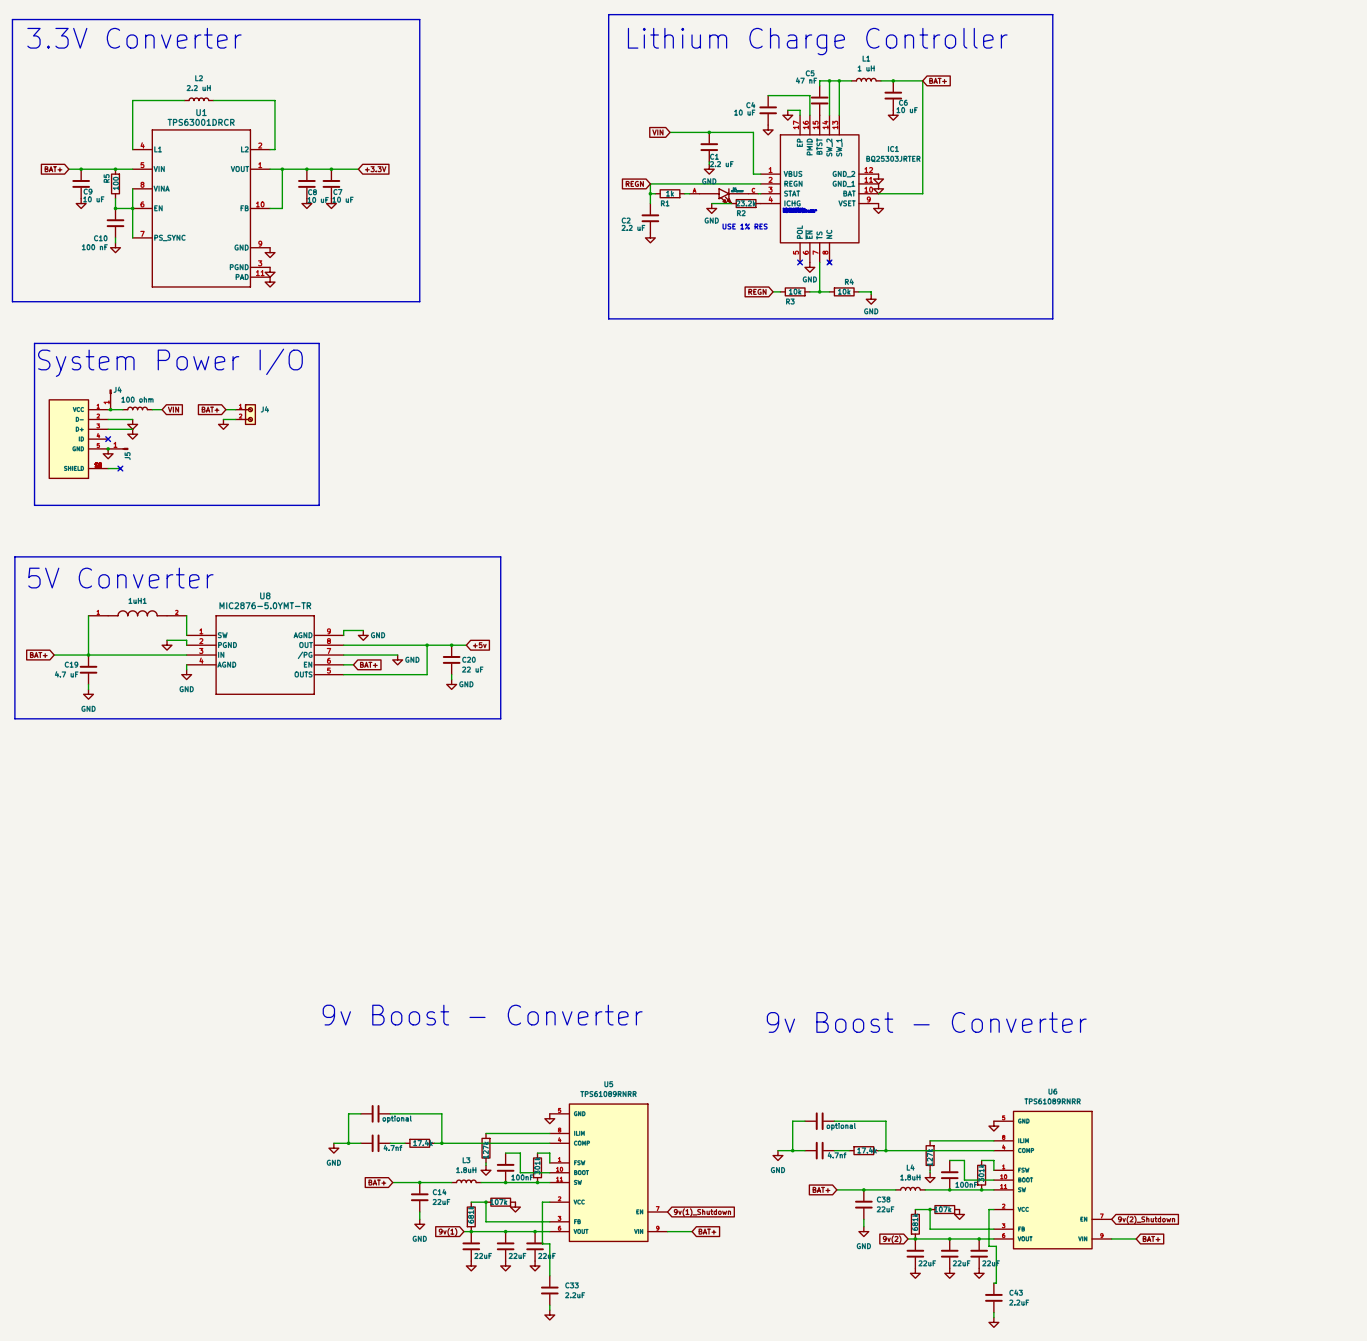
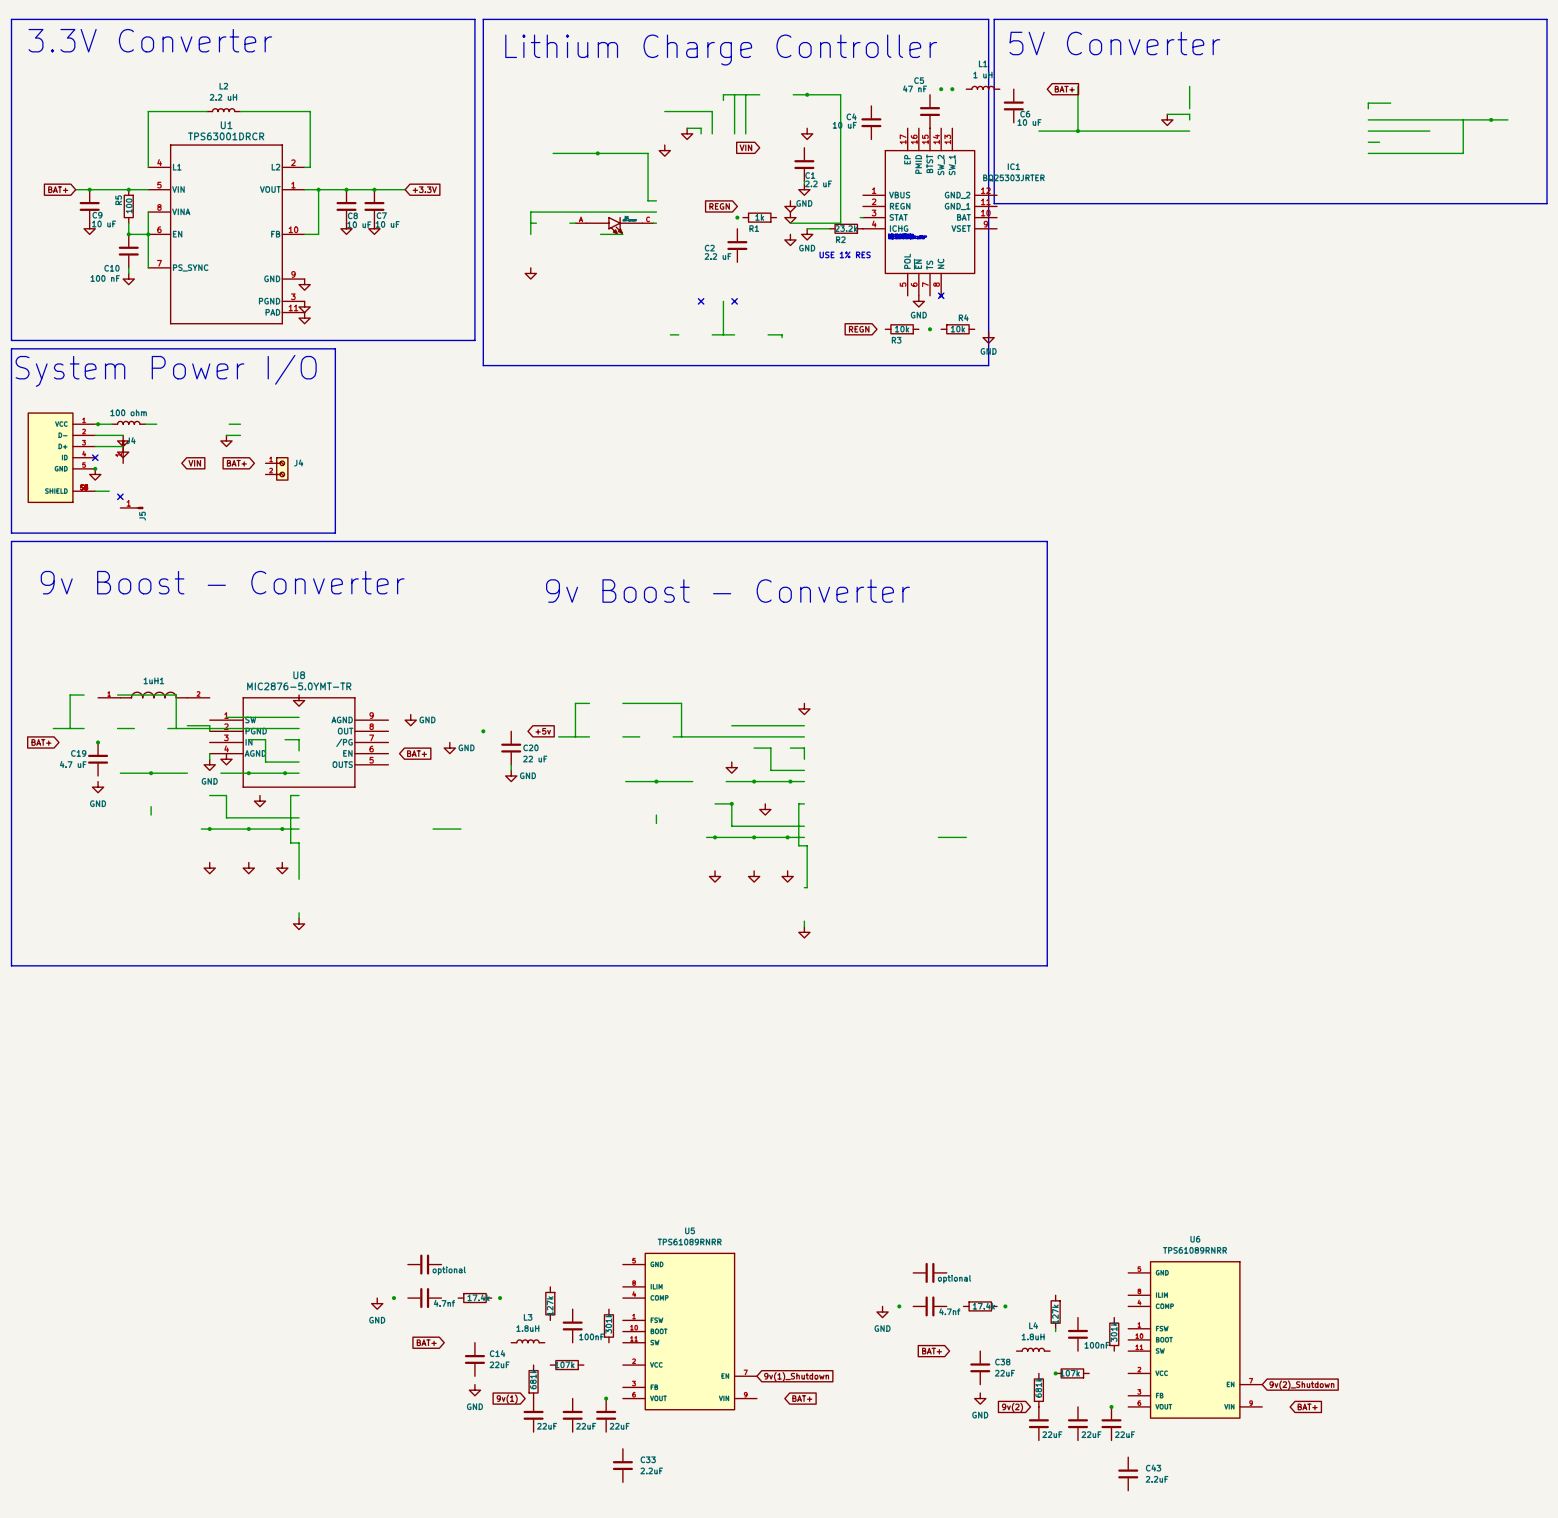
line: (608, 14) (1052, 14) (1052, 318) (608, 318) (608, 14) -> none
line: none -> (483, 19) (988, 19) (988, 365) (483, 365) (483, 19)
line: none -> (994, 19) (1547, 19) (1547, 203) (994, 203) (994, 19)
text: none -> 5V Converter (1114, 43)
text: Lithium Charge Controller (817, 41) -> none
text: none -> Lithium Charge Controller (721, 50)
wire: none -> (1077, 86) (1077, 131)
wire: none -> (1189, 86) (1189, 108)
wire: (829, 80) (829, 115) -> none
wire: (839, 80) (839, 115) -> none
wire: (851, 80) (819, 80) (819, 85) -> none
wire: (881, 80) (922, 80) (922, 193) (878, 193) -> none
junction: (893, 80) -> none
wire: none -> (734, 94) (734, 133)
wire: none -> (745, 94) (745, 133)
wire: none -> (759, 94) (723, 94) (723, 100)
wire: none -> (793, 94) (840, 94) (840, 223) (790, 223)
junction: none -> (807, 94)
wire: none -> (1390, 103) (1368, 103) (1368, 108)
wire: (768, 95) (809, 95) (809, 115) -> none
wire: none -> (664, 111) (712, 111) (712, 133)
wire: none -> (1167, 114) (1189, 114) (1189, 119)
power symbol: none -> (1167, 119)
wire: none -> (1368, 119) (1507, 119)
wire: none -> (1463, 119) (1463, 153) (1368, 153)
junction: none -> (1491, 119)
wire: (787, 110) (800, 110) (800, 115) -> none
wire: none -> (687, 128) (701, 128) (701, 133)
power symbol: (787, 115) -> none
power symbol: (893, 115) -> none
wire: none -> (1038, 131) (1189, 131)
junction: none -> (1077, 131)
wire: none -> (1368, 131) (1429, 131)
power symbol: none -> (687, 133)
power symbol: none -> (807, 133)
wire: none -> (1368, 142) (1379, 142)
power symbol: (768, 129) -> none
wire: (670, 132) (753, 132) (753, 174) (760, 174) -> none
junction: (709, 132) -> none
power symbol: none -> (664, 150)
wire: none -> (553, 153) (648, 153) (648, 200) (656, 200)
junction: none -> (597, 153)
power symbol: (878, 179) -> none
power symbol: none -> (790, 206)
wire: (760, 183) (650, 183) (650, 203) -> none
wire: none -> (656, 212) (530, 212) (530, 234)
power symbol: (878, 188) -> none
wire: (650, 193) (655, 193) -> none
wire: (684, 193) (689, 193) -> none
power symbol: none -> (790, 217)
part position: (723, 195) -> (614, 225)
wire: none -> (530, 223) (536, 223)
wire: none -> (569, 223) (575, 223)
wire: none -> (653, 223) (656, 223)
wire: none -> (600, 234) (622, 234)
power symbol: (878, 208) -> none
power symbol: none -> (790, 239)
power symbol: (650, 237) -> none
power symbol: none -> (530, 273)
no-connect mark: (800, 262) -> none
wire: (819, 262) (819, 291) -> none
no-connect mark: none -> (701, 301)
wire: none -> (723, 301) (723, 334)
no-connect mark: none -> (734, 301)
wire: (773, 291) (780, 291) -> none
wire: (809, 291) (829, 291) -> none
wire: (858, 291) (871, 291) (871, 294) -> none
wire: none -> (670, 334) (678, 334)
wire: none -> (712, 334) (734, 334)
wire: none -> (768, 334) (782, 334) (782, 337)
line: (34, 343) (319, 343) (319, 505) (34, 505) (34, 343) -> (11, 348) (335, 348) (335, 533) (11, 533) (11, 348)
text position: System Power I/O (170, 362) -> System Power I/O (166, 370)
junction: none -> (98, 424)
power symbol: none -> (123, 440)
power symbol: none -> (226, 440)
power symbol: none -> (123, 452)
no-connect mark: none -> (95, 457)
part position: (137, 408) -> (128, 422)
wire: (108, 409) (122, 409) -> (95, 424) (112, 424)
junction: (110, 409) -> none
wire: (152, 409) (162, 409) -> (145, 424) (156, 424)
wire: (225, 409) (235, 409) -> (229, 424) (240, 424)
junction: none -> (95, 468)
power symbol: none -> (95, 474)
wire: (108, 419) (132, 419) -> (95, 435) (123, 435)
wire: (223, 419) (235, 419) -> (226, 435) (240, 435)
power symbol: (132, 424) -> none
power symbol: (223, 424) -> none
wire: (108, 429) (132, 429) -> (95, 446) (123, 446)
power symbol: (132, 434) -> none
part position: (78, 439) -> (61, 457)
junction: (108, 448) -> none
power symbol: (108, 453) -> none
wire: (108, 468) (120, 468) -> (95, 491) (109, 491)
no-connect mark: (120, 468) -> none
line: none -> (11, 541) (11, 965) (1047, 965) (1047, 541) (11, 541)
text: none -> 9v Boost - Converter (222, 582)
text: none -> 9v Boost - Converter (727, 591)
line: (14, 556) (500, 556) (500, 718) (14, 718) (14, 556) -> none
text: 5V Converter (120, 578) -> none
wire: none -> (84, 695) (70, 695) (70, 728)
wire: none -> (117, 695) (176, 695) (176, 728)
wire: (88, 615) (88, 655) -> none
wire: (186, 615) (186, 635) -> none
power symbol: none -> (299, 700)
wire: none -> (589, 703) (575, 703) (575, 736)
wire: none -> (622, 703) (681, 703) (681, 736)
power symbol: none -> (804, 708)
wire: (363, 630) (343, 630) (343, 635) -> none
wire: none -> (226, 717) (299, 717)
wire: none -> (731, 725) (804, 725)
wire: none -> (53, 728) (84, 728)
wire: none -> (117, 728) (134, 728)
wire: none -> (167, 728) (299, 728)
power symbol position: (167, 645) -> (226, 759)
wire: (343, 645) (466, 645) -> none
wire: (427, 645) (427, 674) (343, 674) -> none
junction: (451, 645) -> none
wire: none -> (558, 736) (589, 736)
wire: none -> (622, 736) (639, 736)
wire: none -> (673, 736) (804, 736)
wire: none -> (248, 739) (265, 739) (265, 762) (299, 762)
wire: none -> (285, 739) (299, 739) (299, 750)
wire: (54, 655) (186, 655) -> none
wire: (343, 655) (397, 655) -> none
wire: none -> (754, 748) (770, 748) (770, 770) (804, 770)
wire: none -> (790, 748) (804, 748) (804, 759)
wire: (343, 664) (353, 664) -> none
power symbol: none -> (731, 767)
wire: none -> (120, 773) (187, 773)
junction: none -> (151, 773)
wire: none -> (220, 773) (299, 773)
junction: none -> (248, 773)
junction: none -> (285, 773)
wire: (88, 684) (88, 689) -> none
wire: none -> (625, 781) (692, 781)
junction: none -> (656, 781)
wire: none -> (726, 781) (804, 781)
junction: none -> (754, 781)
junction: none -> (790, 781)
wire: none -> (209, 795) (226, 795) (226, 817) (299, 817)
wire: none -> (299, 795) (290, 795) (290, 842) (299, 842) (299, 879)
power symbol: none -> (259, 801)
wire: none -> (715, 803) (731, 803) (731, 826) (804, 826)
junction: none -> (731, 803)
wire: none -> (804, 803) (798, 803) (798, 845) (807, 845) (807, 887) (804, 887)
wire: none -> (151, 806) (151, 815)
power symbol: none -> (765, 809)
wire: none -> (656, 815) (656, 823)
wire: none -> (201, 829) (299, 829)
junction: none -> (209, 829)
junction: none -> (248, 829)
junction: none -> (282, 829)
wire: none -> (433, 829) (460, 829)
wire: none -> (706, 837) (804, 837)
junction: none -> (715, 837)
junction: none -> (754, 837)
junction: none -> (787, 837)
wire: none -> (938, 837) (966, 837)
power symbol: none -> (209, 868)
power symbol: none -> (248, 868)
power symbol: none -> (282, 868)
power symbol: none -> (715, 876)
power symbol: none -> (754, 876)
power symbol: none -> (787, 876)
wire: none -> (299, 912) (299, 918)
wire: none -> (804, 921) (804, 926)
power symbol: none -> (299, 923)
power symbol: none -> (804, 932)
text: 9v Boost - Converter (482, 1015) -> none
text: 9v Boost - Converter (926, 1022) -> none
wire: (360, 1113) (348, 1113) (348, 1143) -> none
wire: (390, 1113) (441, 1113) (441, 1143) -> none
power symbol: (549, 1118) -> none
wire: (804, 1121) (792, 1121) (792, 1150) -> none
wire: (834, 1121) (885, 1121) (885, 1150) -> none
power symbol: (993, 1126) -> none
wire: (485, 1133) (549, 1133) -> none
wire: (930, 1140) (993, 1140) -> none
wire: (333, 1143) (360, 1143) -> none
wire: (390, 1143) (405, 1143) -> none
wire: (434, 1143) (549, 1143) -> none
wire: (777, 1150) (804, 1150) -> none
wire: (834, 1150) (849, 1150) -> none
wire: (878, 1150) (993, 1150) -> none
wire: (505, 1153) (520, 1153) (520, 1172) (549, 1172) -> none
wire: (537, 1153) (549, 1153) (549, 1162) -> none
wire: (949, 1160) (964, 1160) (964, 1180) (993, 1180) -> none
wire: (981, 1160) (993, 1160) (993, 1170) -> none
wire: (485, 1162) (485, 1165) -> none
power symbol: (485, 1170) -> none
power symbol: (930, 1177) -> none
wire: (392, 1182) (451, 1182) -> none
junction: (419, 1182) -> none
wire: (481, 1182) (549, 1182) -> none
junction: (505, 1182) -> none
junction: (537, 1182) -> none
wire: (836, 1189) (895, 1189) -> none
junction: (863, 1189) -> none
wire: (925, 1189) (993, 1189) -> none
junction: (949, 1189) -> none
junction: (981, 1189) -> none
wire: (471, 1202) (485, 1202) (485, 1221) (549, 1221) -> none
junction: (485, 1202) -> none
wire: (549, 1202) (542, 1202) (542, 1243) (549, 1243) (549, 1275) -> none
power symbol: (515, 1207) -> none
wire: (915, 1209) (930, 1209) (930, 1229) (993, 1229) -> none
wire: (993, 1209) (988, 1209) (988, 1246) (996, 1246) (996, 1283) (993, 1283) -> none
wire: (419, 1211) (419, 1219) -> none
power symbol: (959, 1214) -> none
wire: (863, 1219) (863, 1226) -> none
wire: (463, 1231) (549, 1231) -> none
junction: (471, 1231) -> none
junction: (505, 1231) -> none
wire: (667, 1231) (692, 1231) -> none
wire: (908, 1238) (993, 1238) -> none
junction: (915, 1238) -> none
junction: (949, 1238) -> none
wire: (1111, 1238) (1136, 1238) -> none
power symbol: (471, 1265) -> none
power symbol: (505, 1265) -> none
power symbol: (535, 1265) -> none
power symbol: (915, 1273) -> none
power symbol: (949, 1273) -> none
power symbol: (979, 1273) -> none
wire: (549, 1305) (549, 1310) -> none
wire: (993, 1312) (993, 1317) -> none
power symbol: (549, 1315) -> none
power symbol: (993, 1322) -> none

